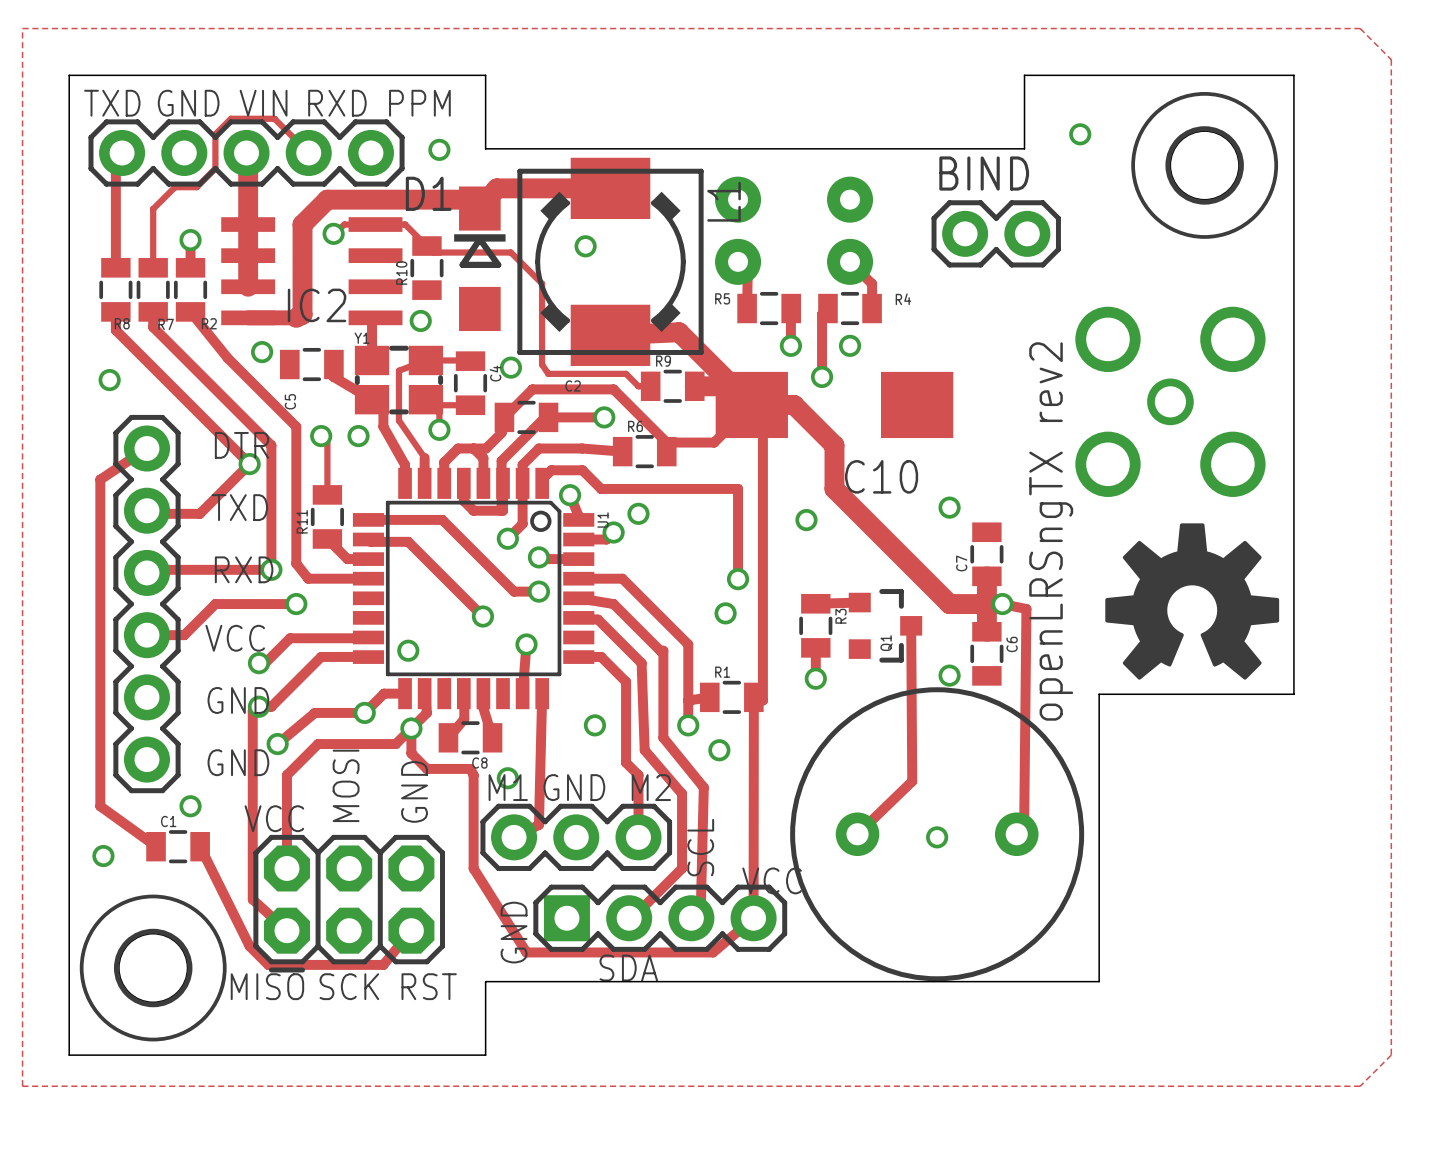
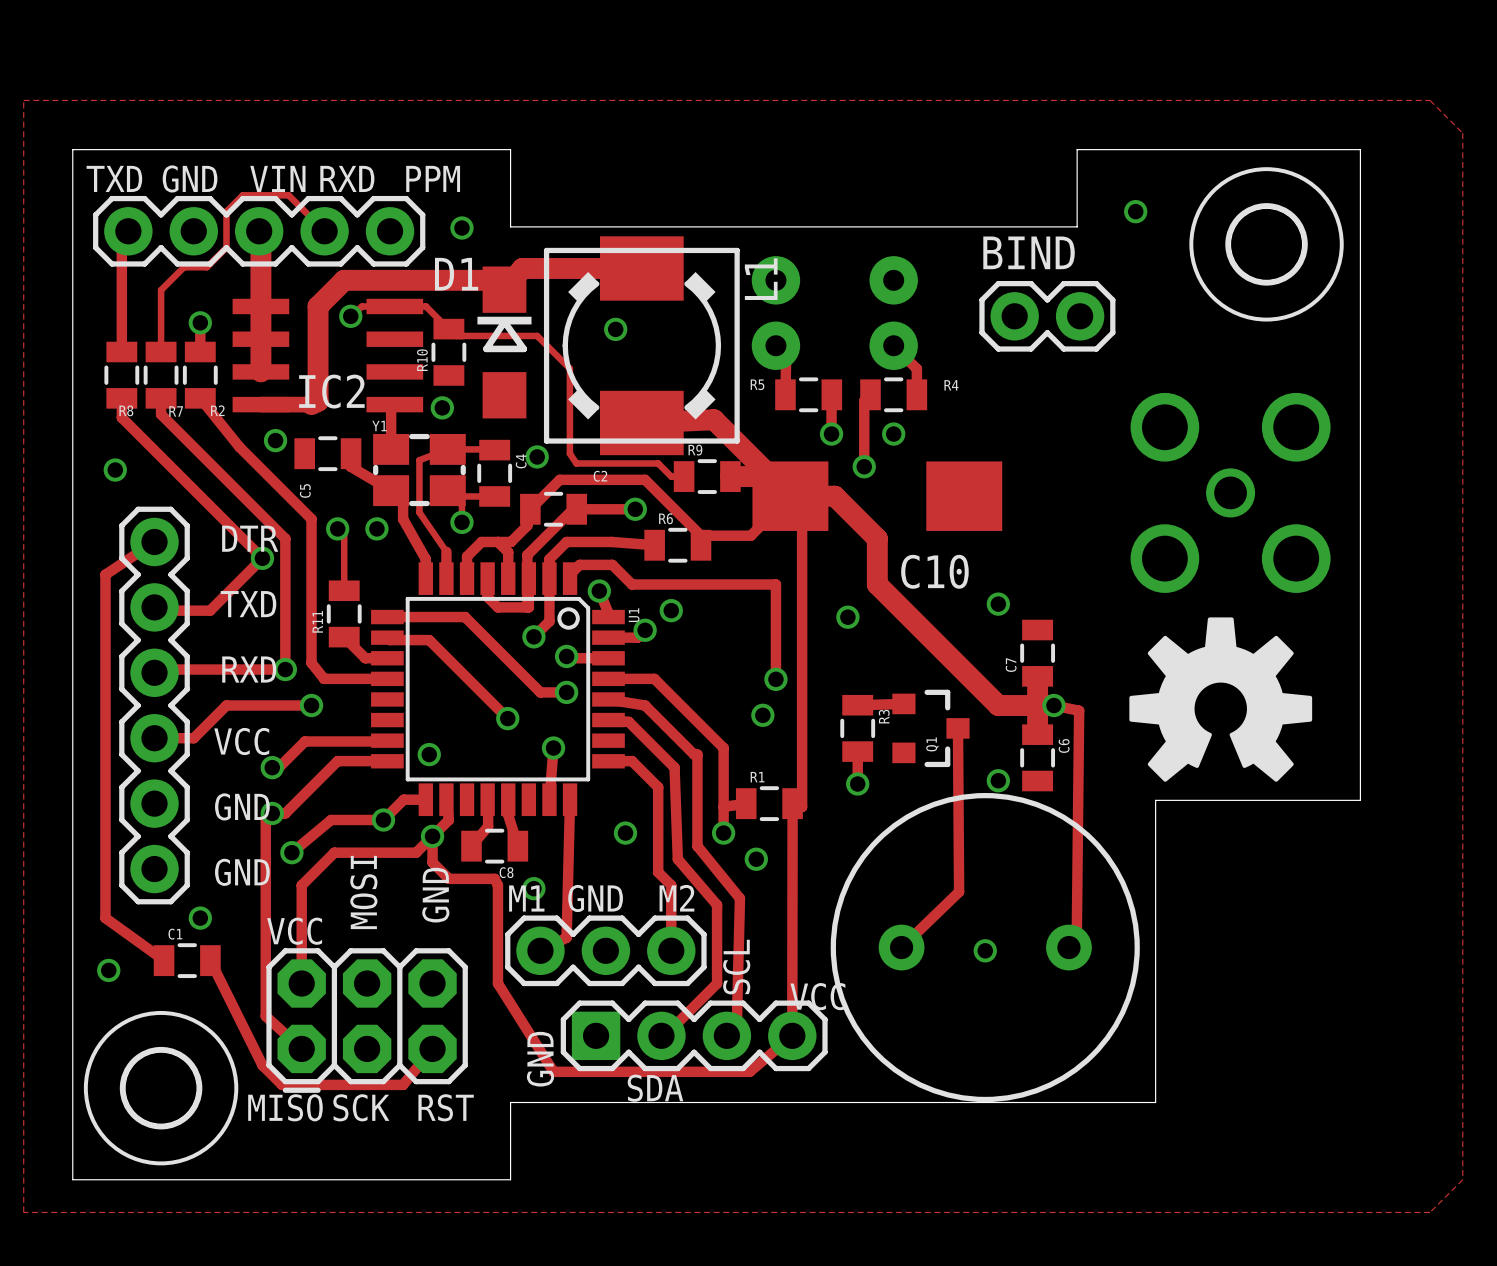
text: openLRSngTX rev2 (1051, 531) -> none
drawing position: (1192, 601) -> (1220, 699)

